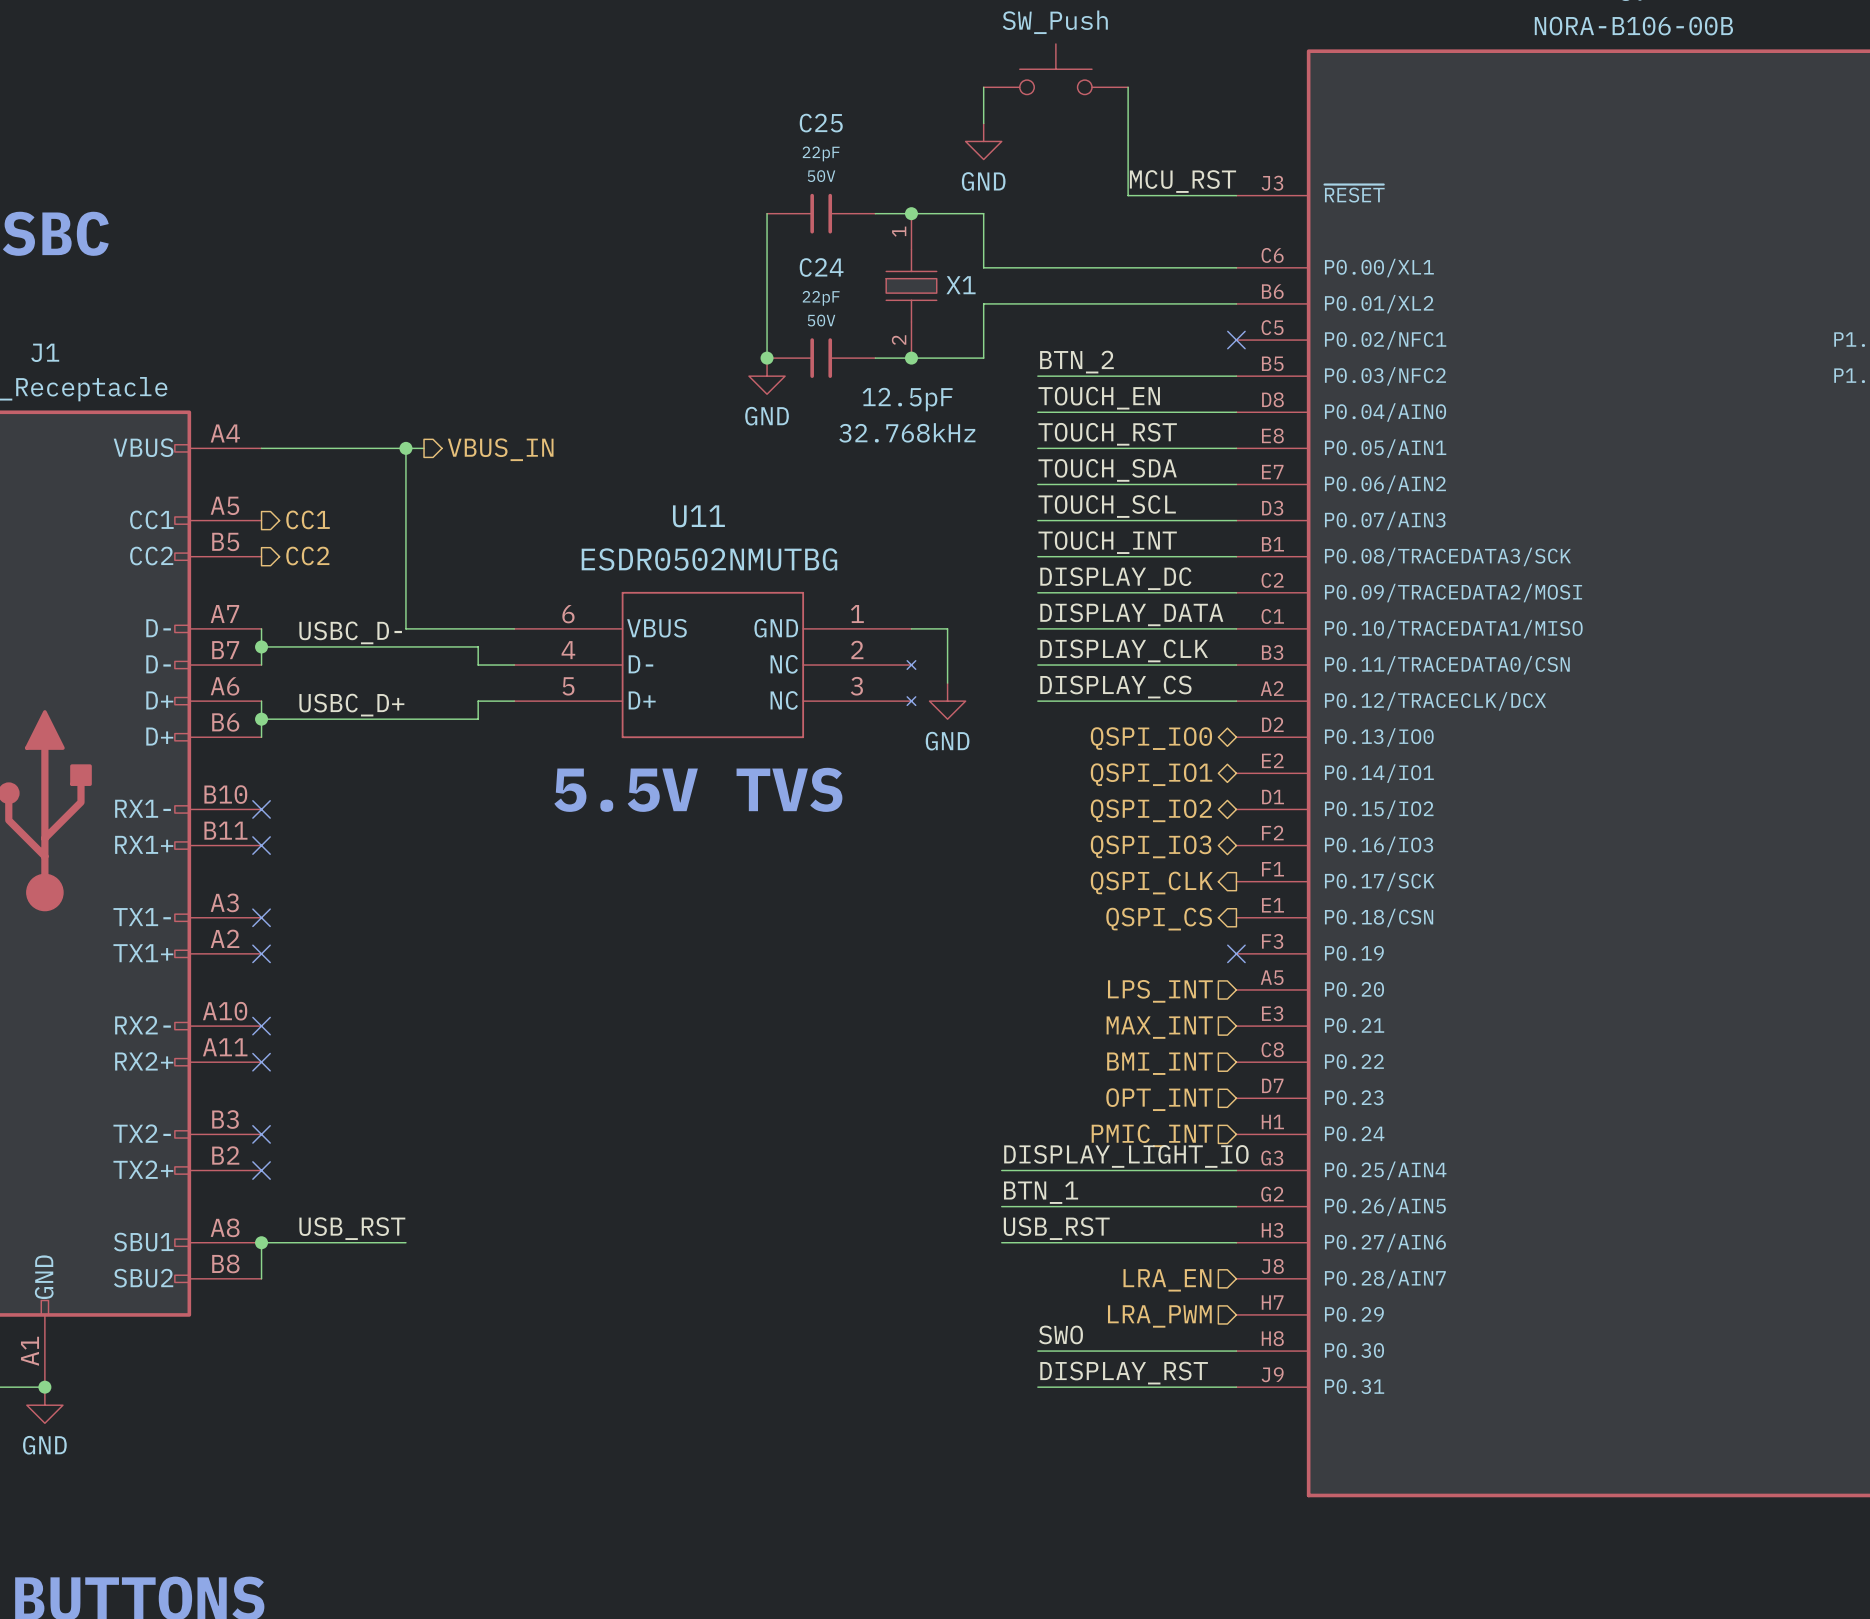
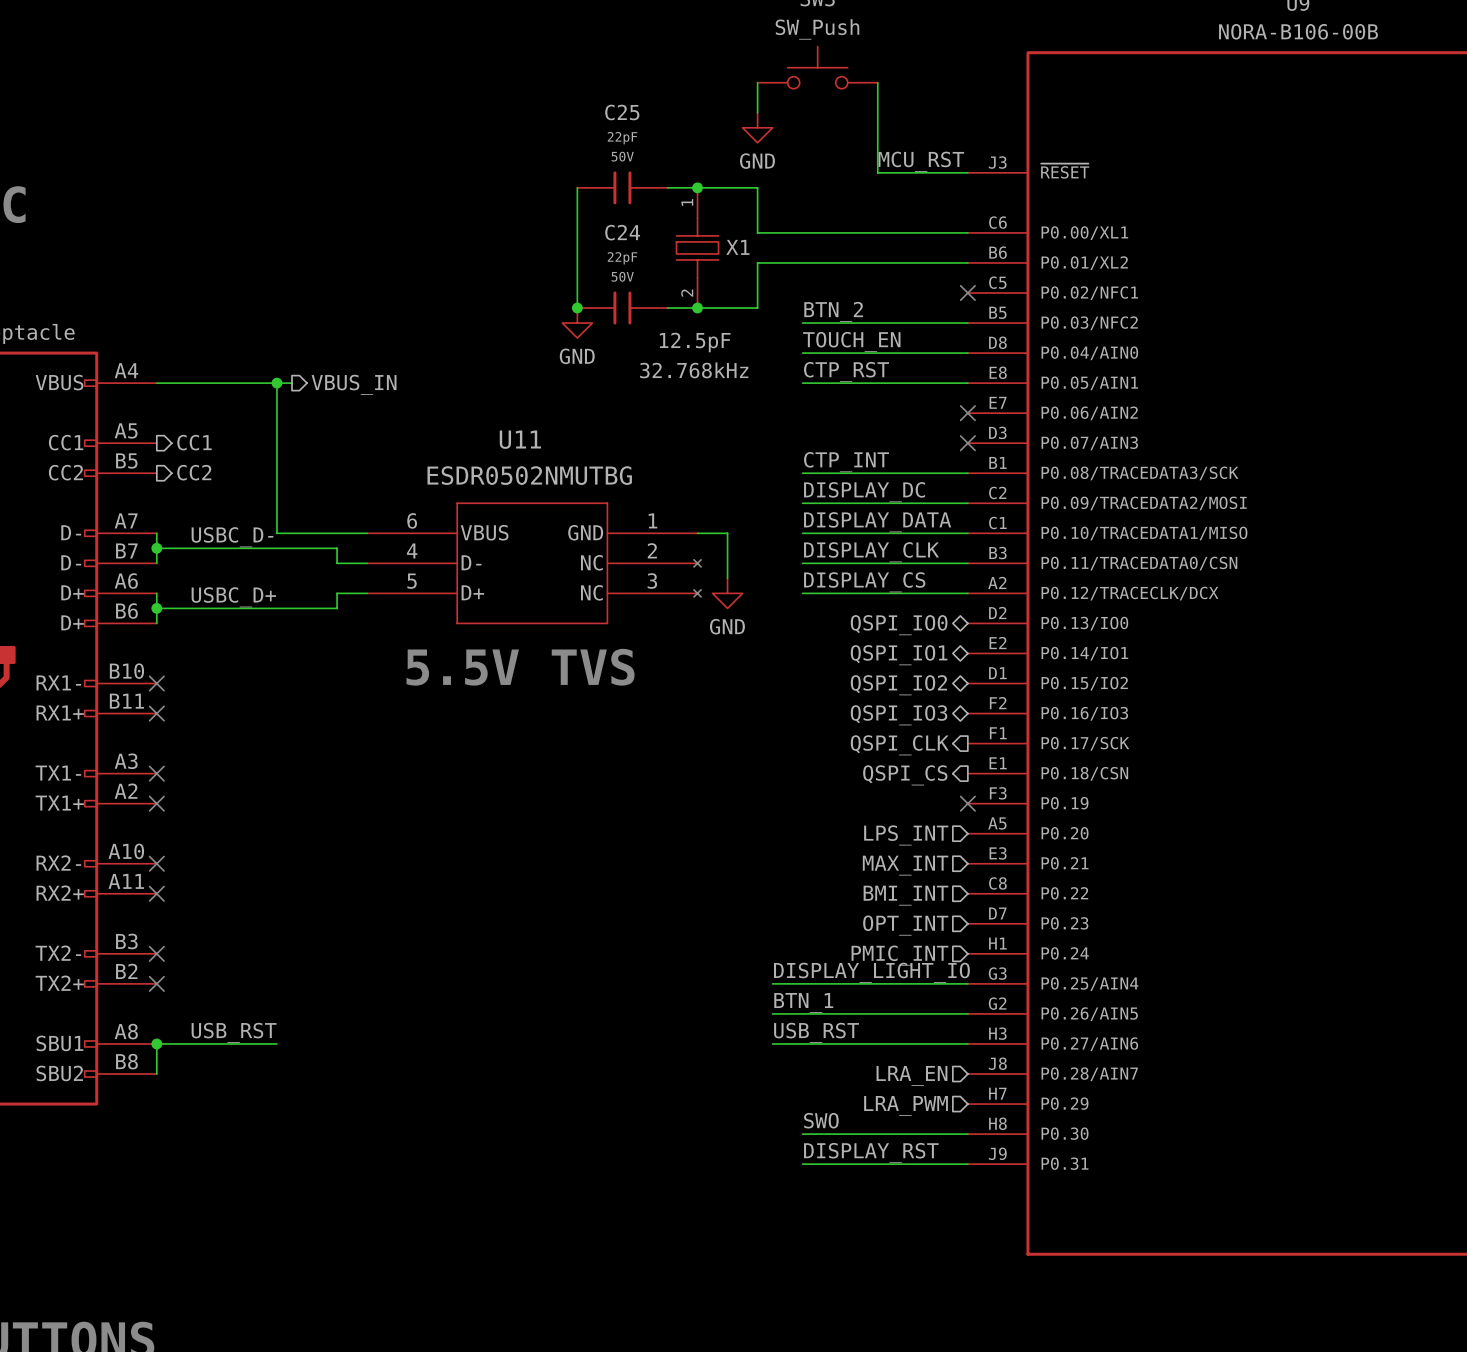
label: TOUCH_RST (1107, 434) -> CTP_RST (846, 372)
label: TOUCH_SDA (1107, 470) -> none
wire: (1037, 484) (1236, 484) -> none
no-connect mark: none -> (967, 413)
label: TOUCH_SCL (1107, 506) -> none
wire: (1037, 520) (1236, 520) -> none
no-connect mark: none -> (967, 443)
label: TOUCH_INT (1107, 542) -> CTP_INT (846, 462)

